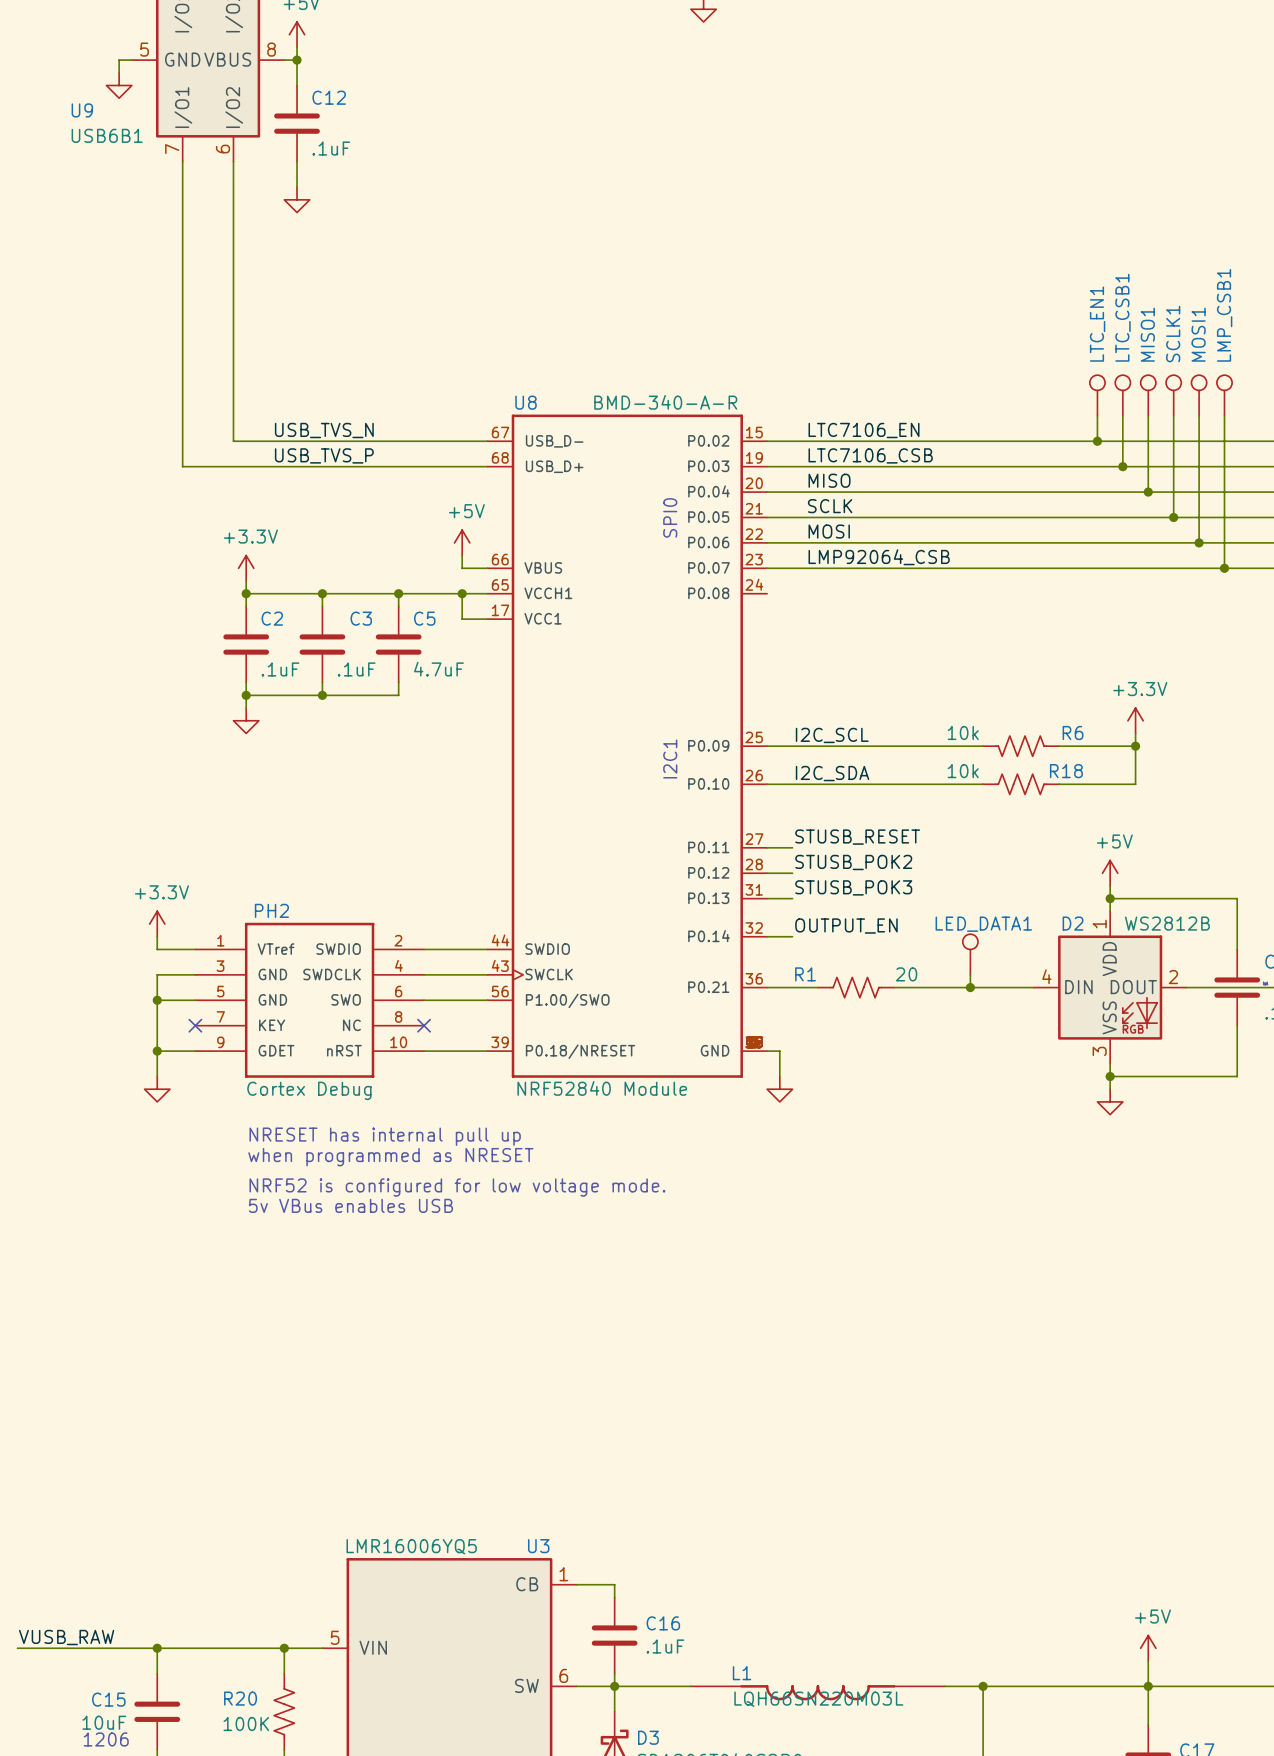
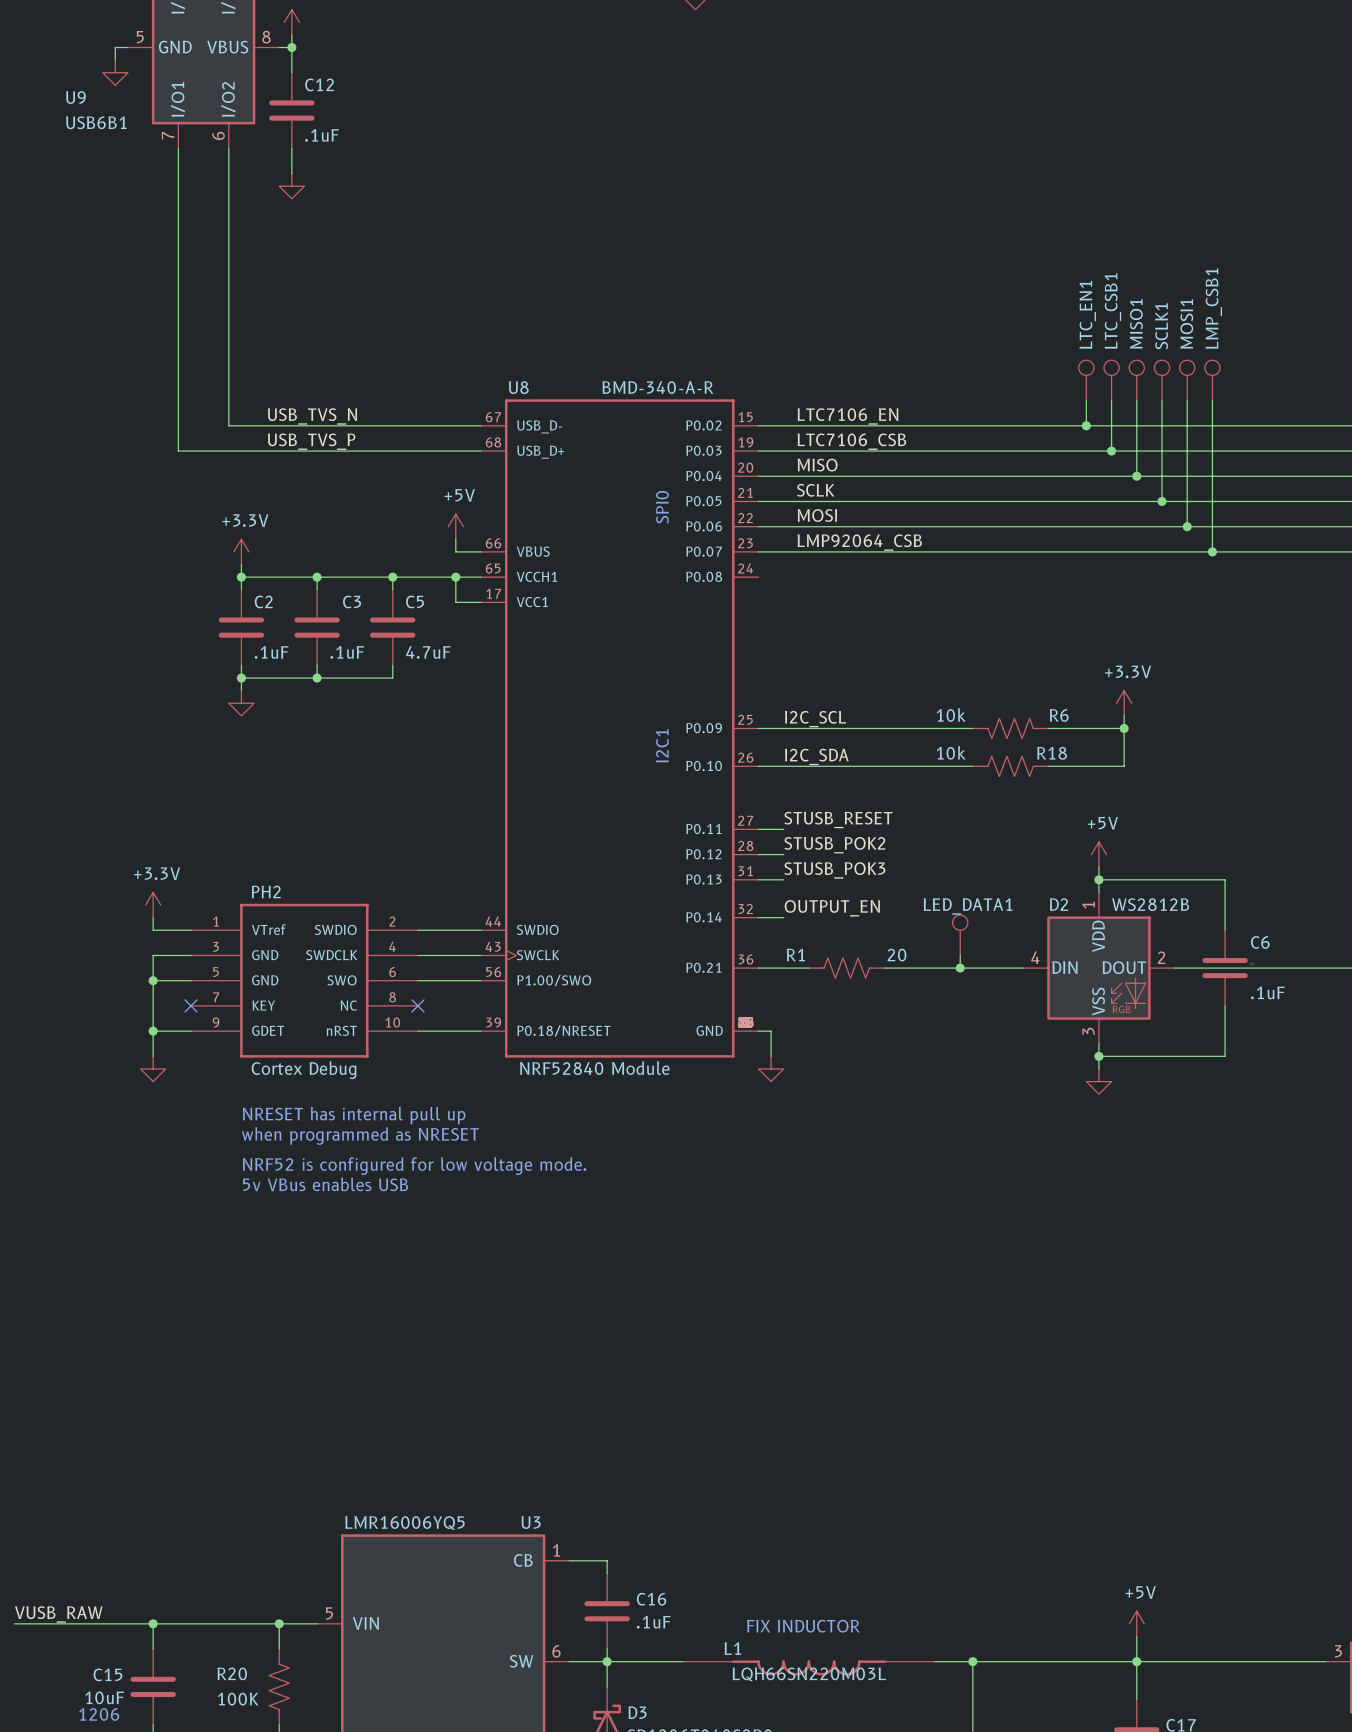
text: none -> FIX INDUCTOR (803, 1626)

